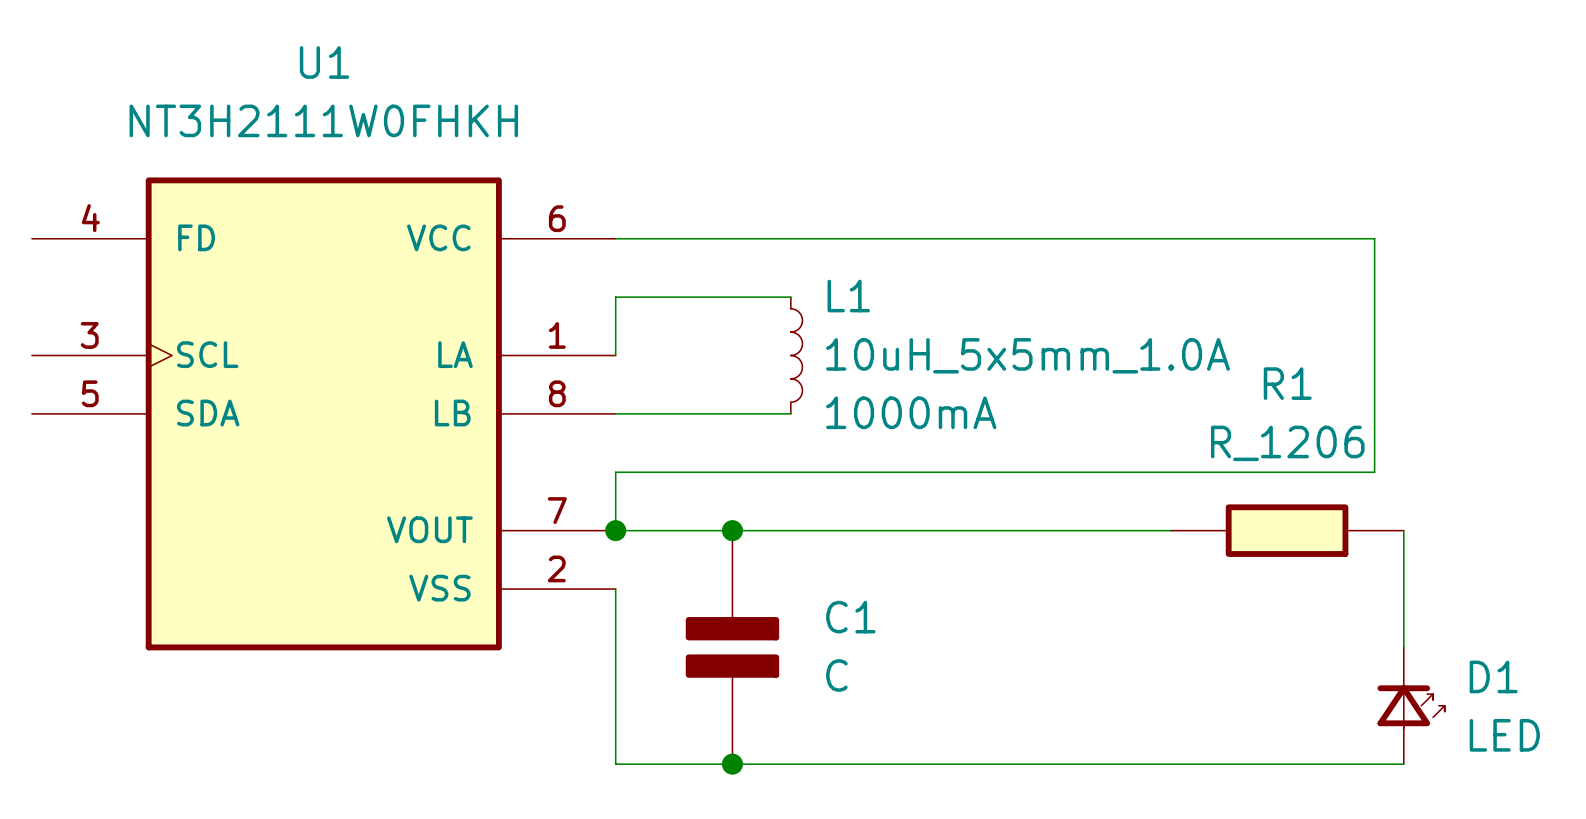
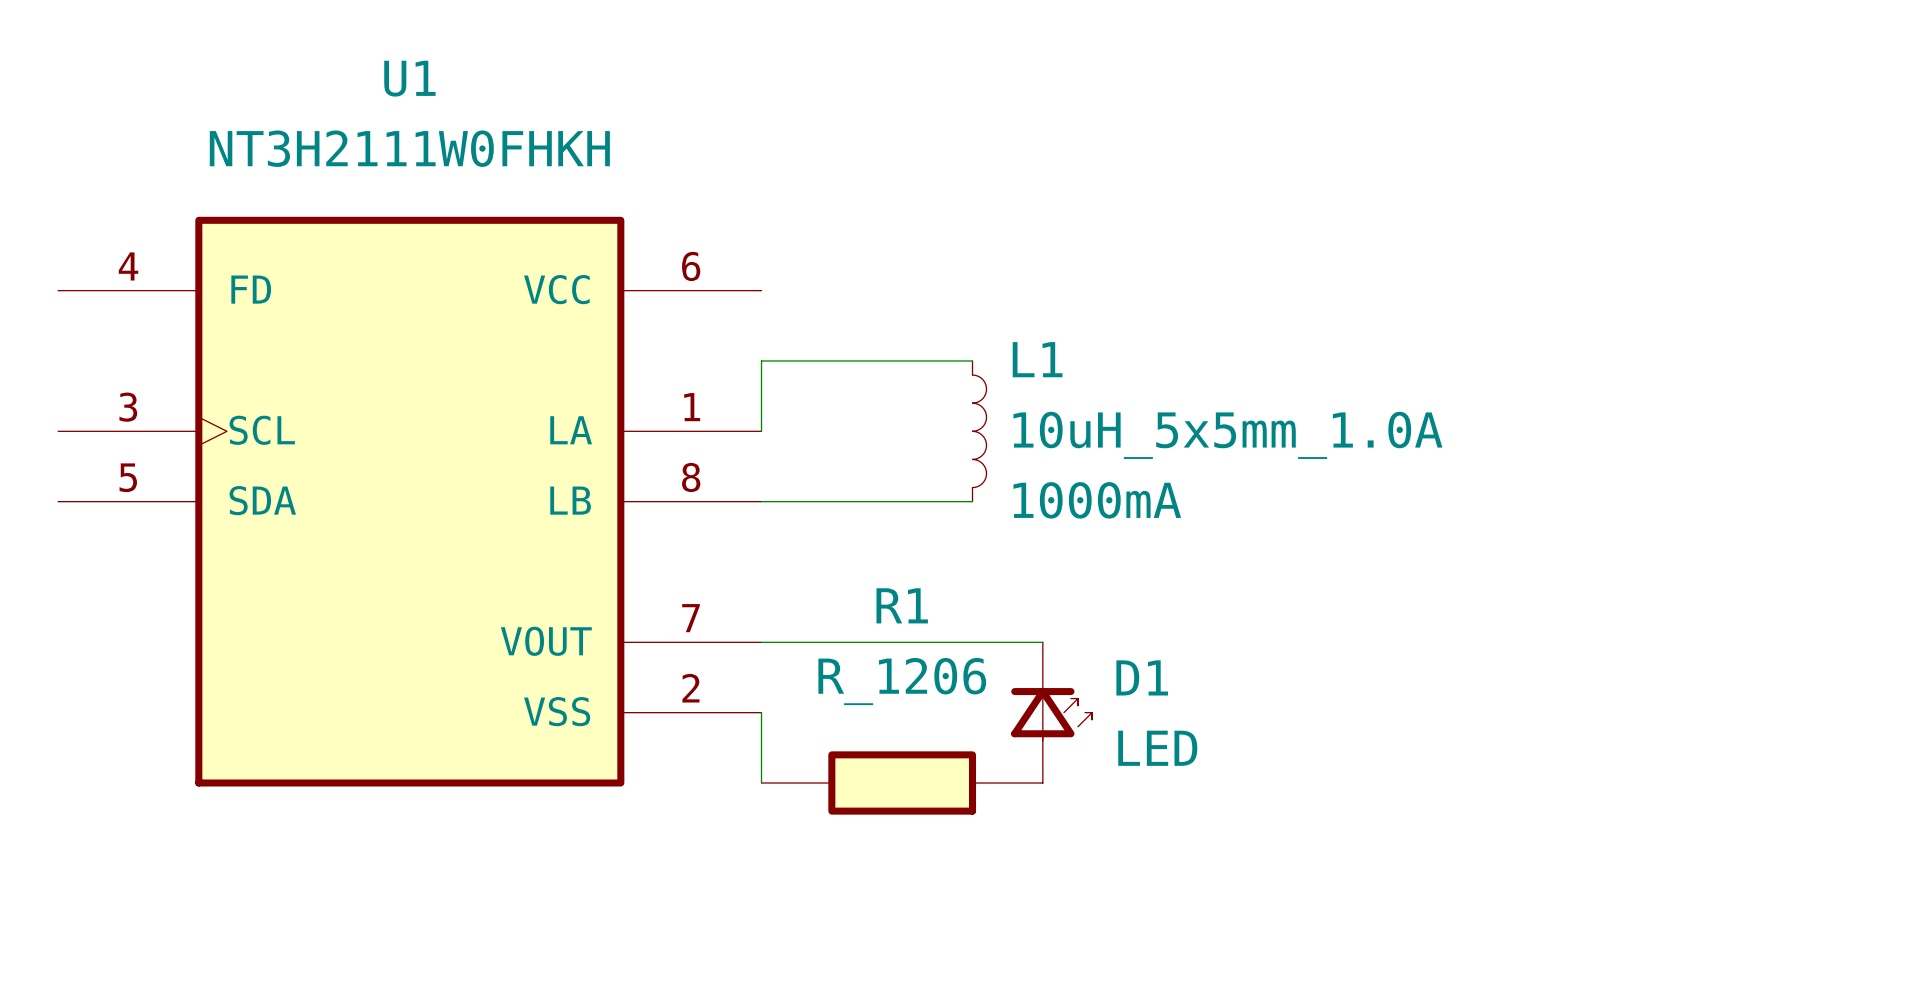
wire: (615, 238) (1374, 238) (1374, 472) (615, 472) (615, 530) -> none
junction: (615, 530) -> none
junction: (732, 530) -> none
wire: (849, 530) (1170, 530) -> none
R1 position: (1287, 530) -> (902, 782)
wire: (1403, 530) (1403, 647) -> none
wire: (615, 647) (615, 764) (1403, 764) -> none
C1: C (732, 647) -> none
D1 position: (1411, 705) -> (1051, 712)
junction: (732, 764) -> none

